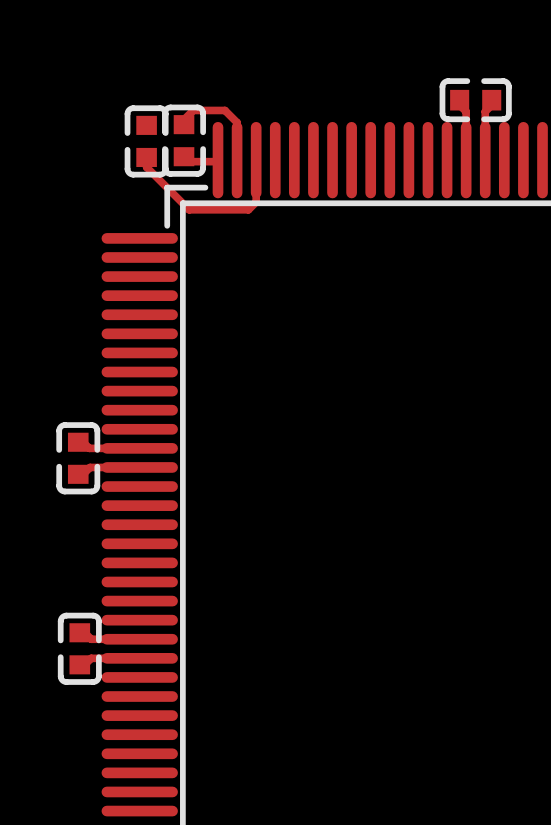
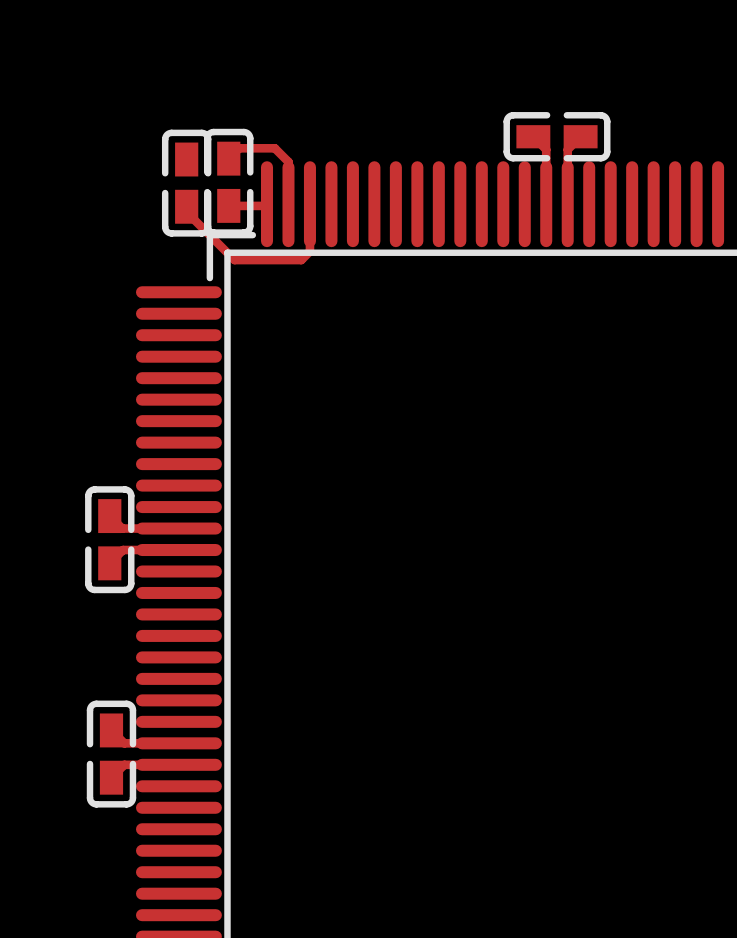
part footprint: [439, 78, 512, 123] -> [503, 112, 611, 162]
part footprint: [162, 104, 206, 177] -> [204, 128, 254, 236]
part footprint: [124, 105, 169, 178] -> [161, 129, 212, 237]
part footprint: [56, 422, 101, 495] -> [85, 486, 135, 594]
part footprint: [57, 612, 102, 685] -> [86, 700, 137, 808]

